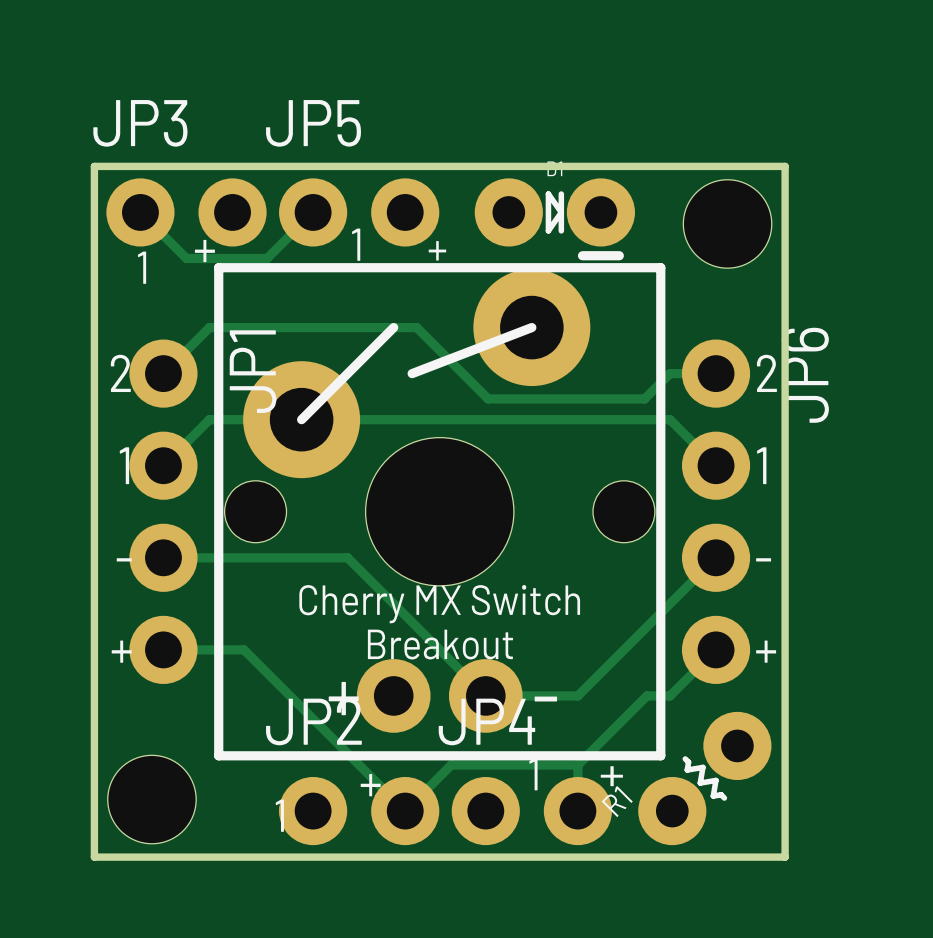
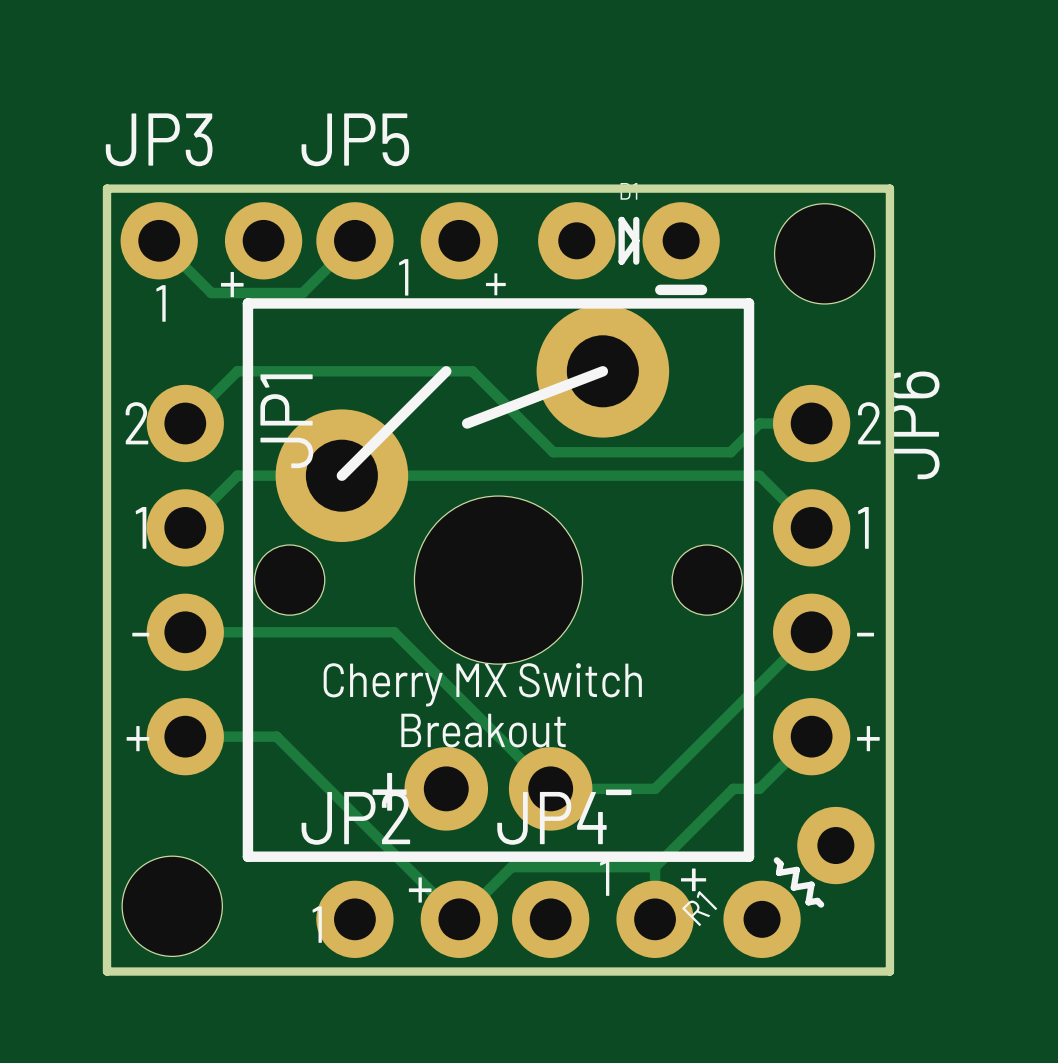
text position: Cherry MX Switch (439, 604) -> Cherry MX Switch (482, 684)
text position: Breakout (440, 644) -> Breakout (483, 730)

